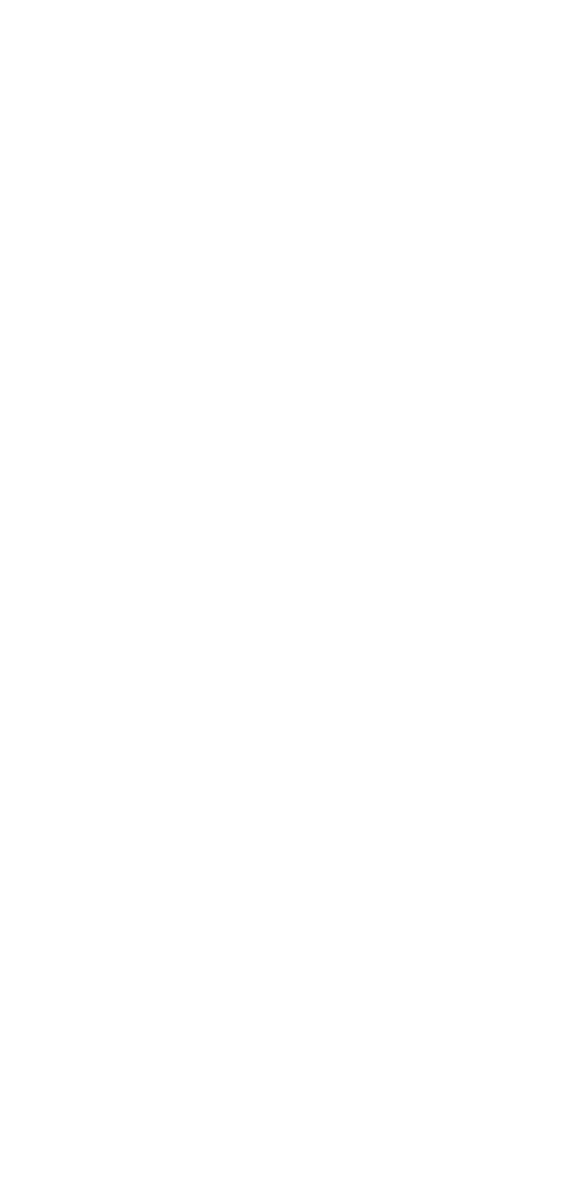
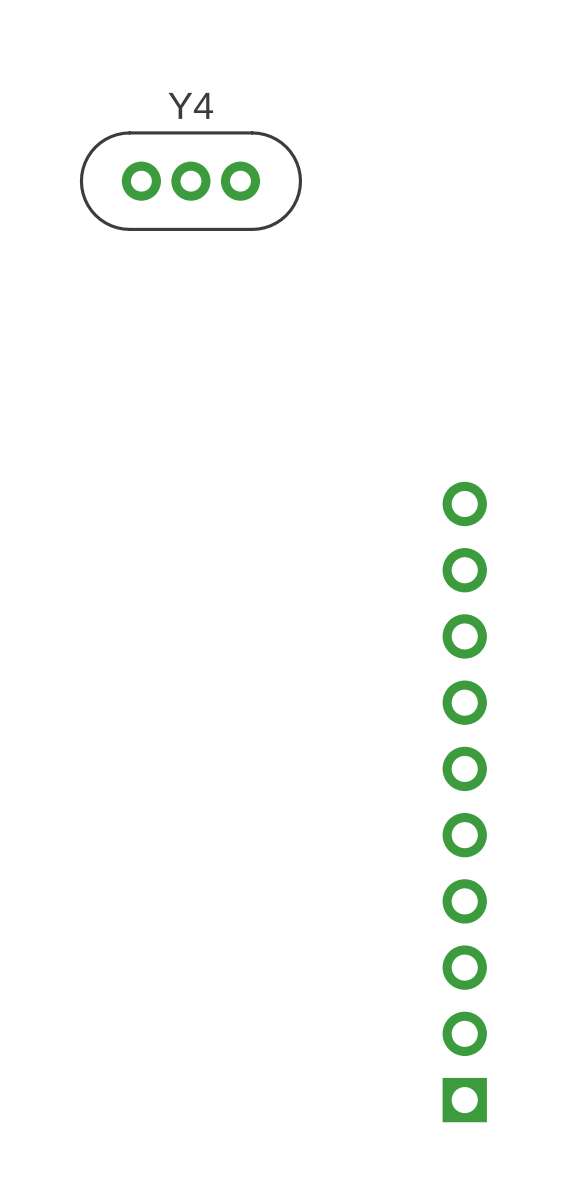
Y4: none -> (190, 181)
part: none -> (464, 802)

